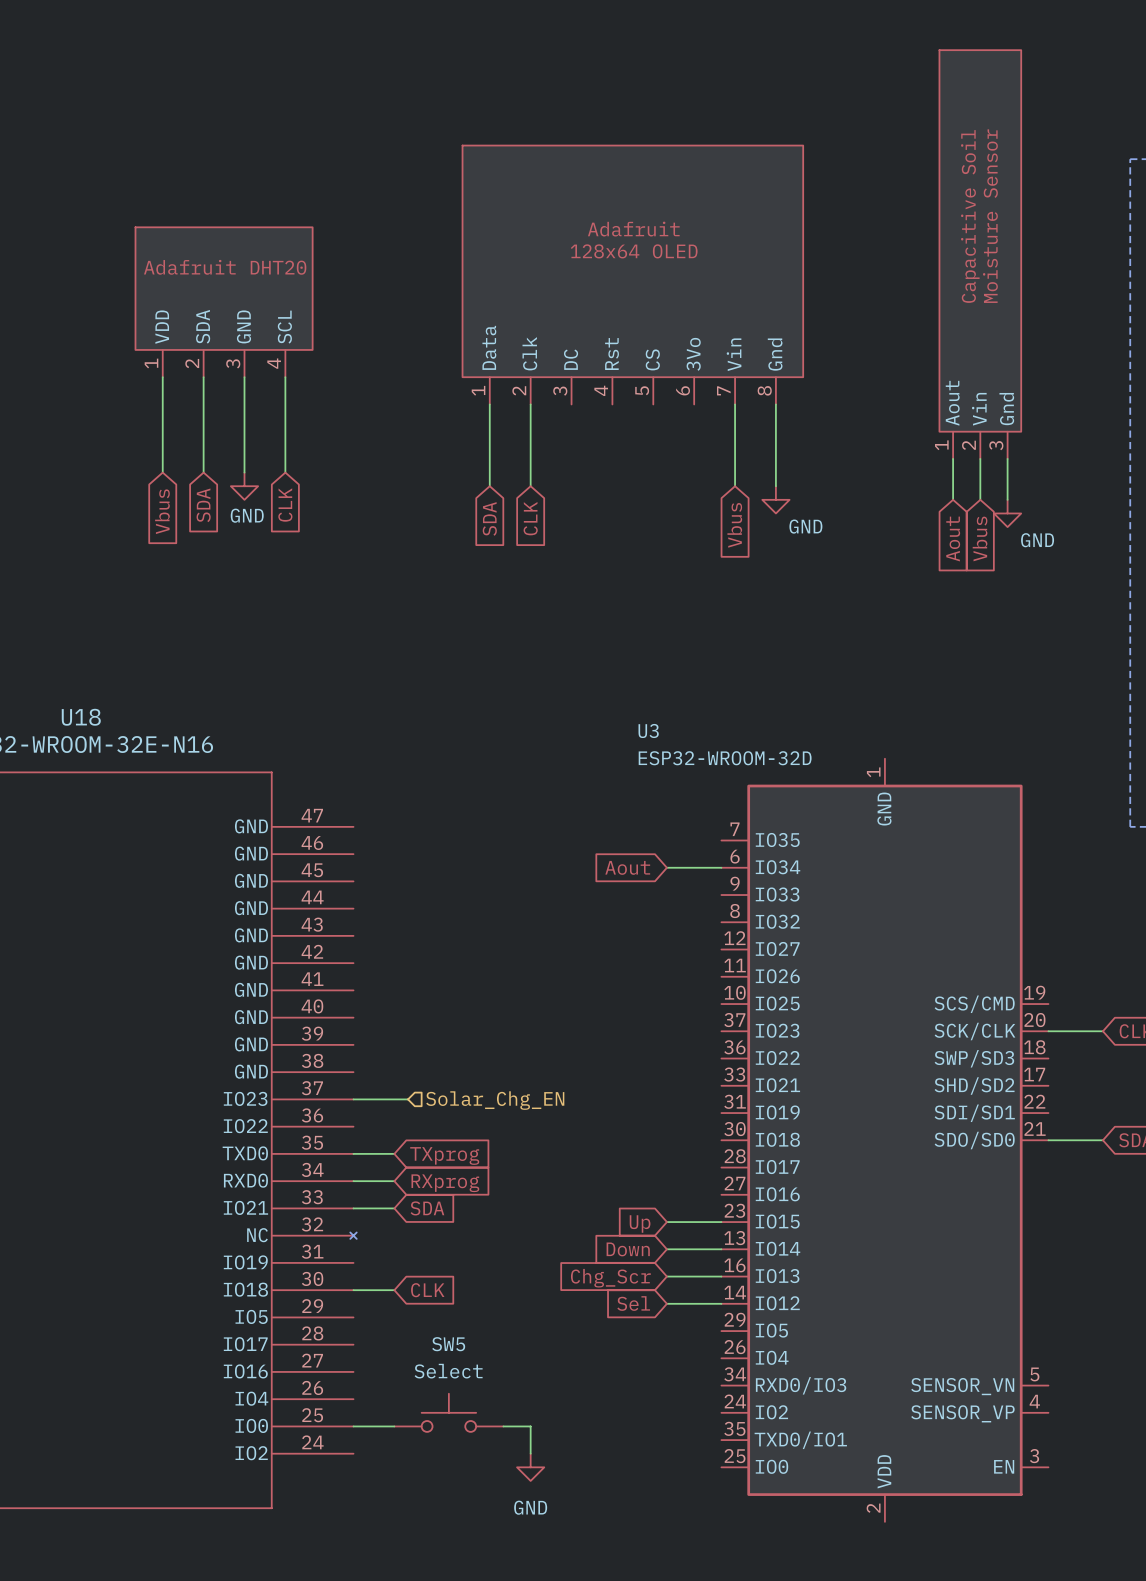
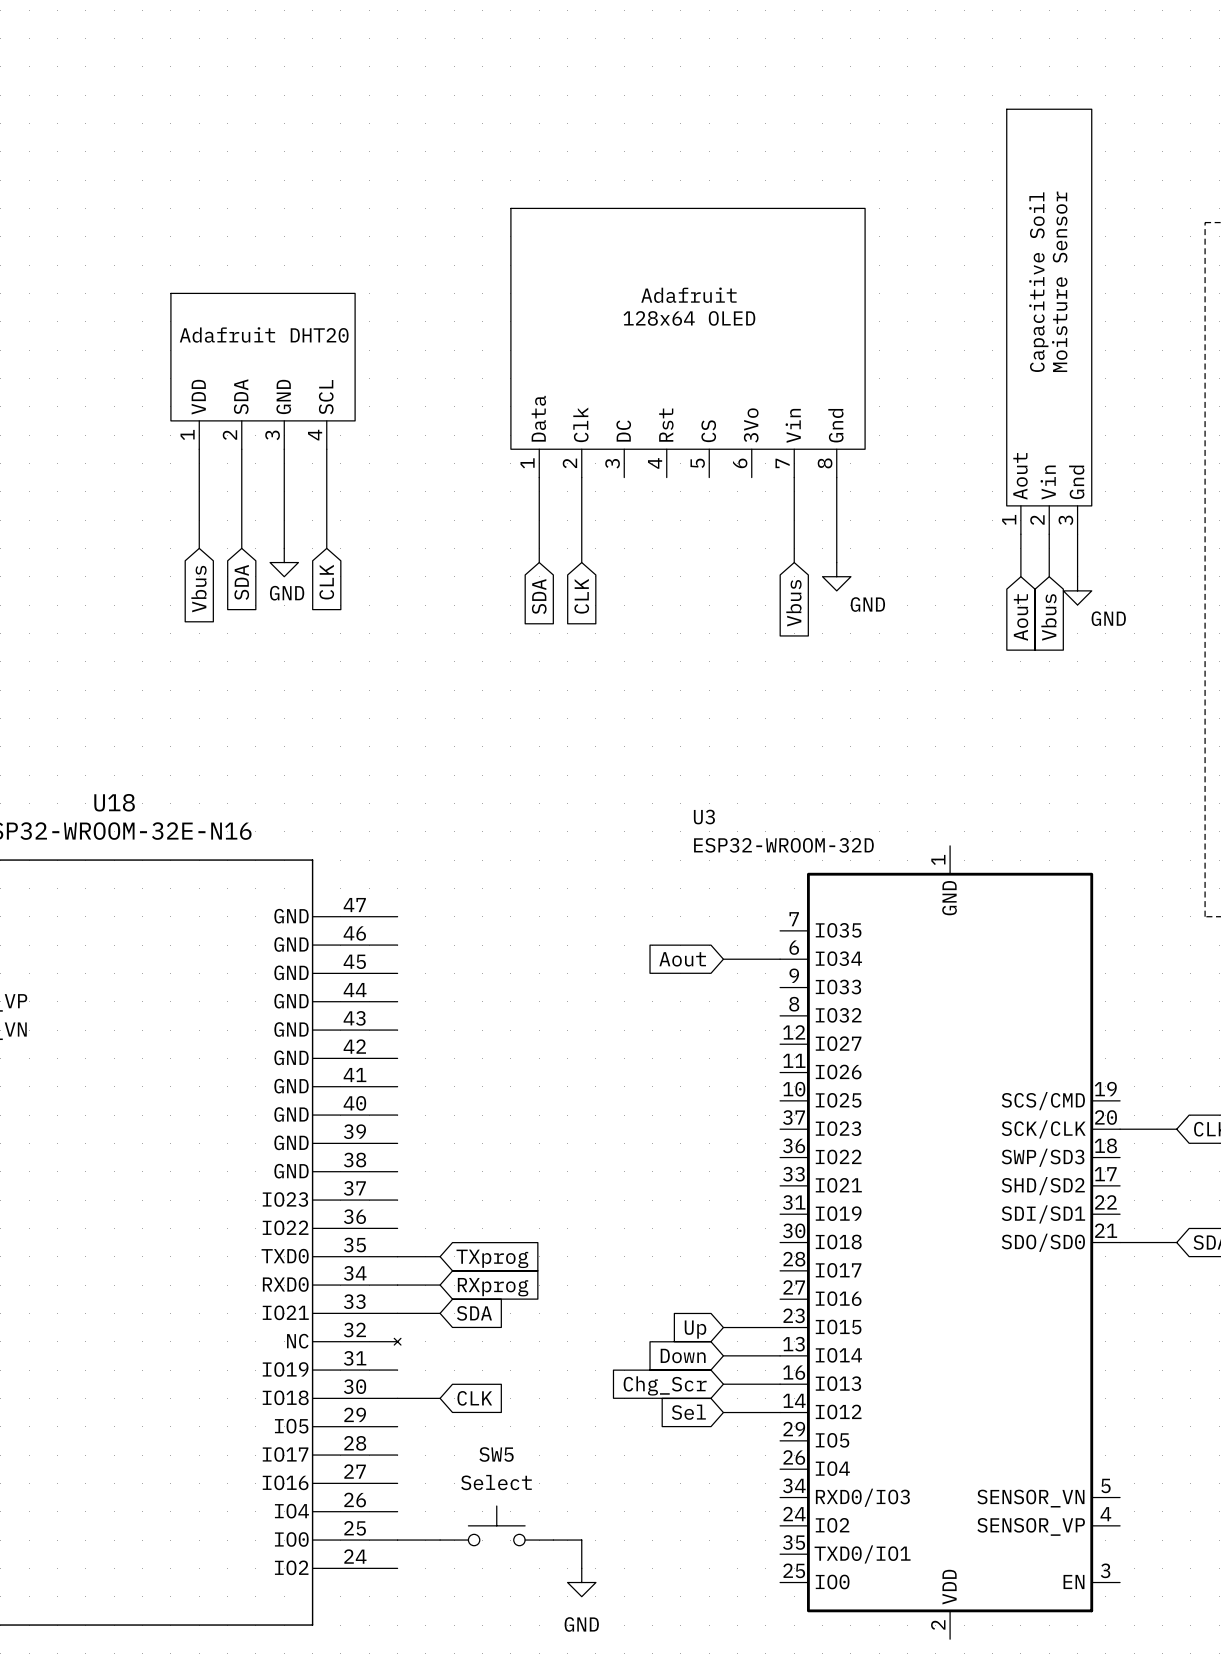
wire: (353, 1099) (408, 1099) -> none
hierarchical label: Solar_Chg_EN (495, 1100) -> none

